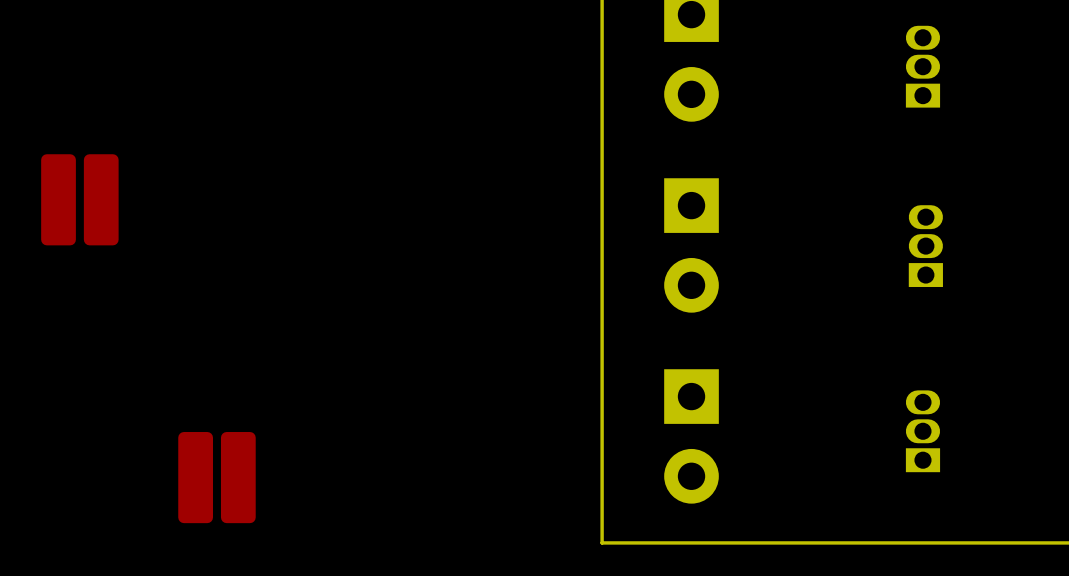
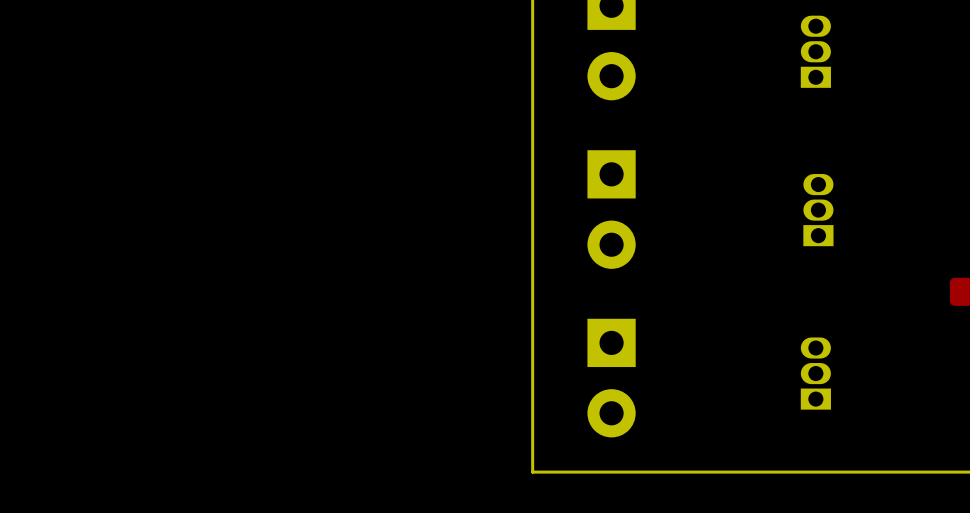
part: (79, 199) -> none
part: (216, 477) -> none

